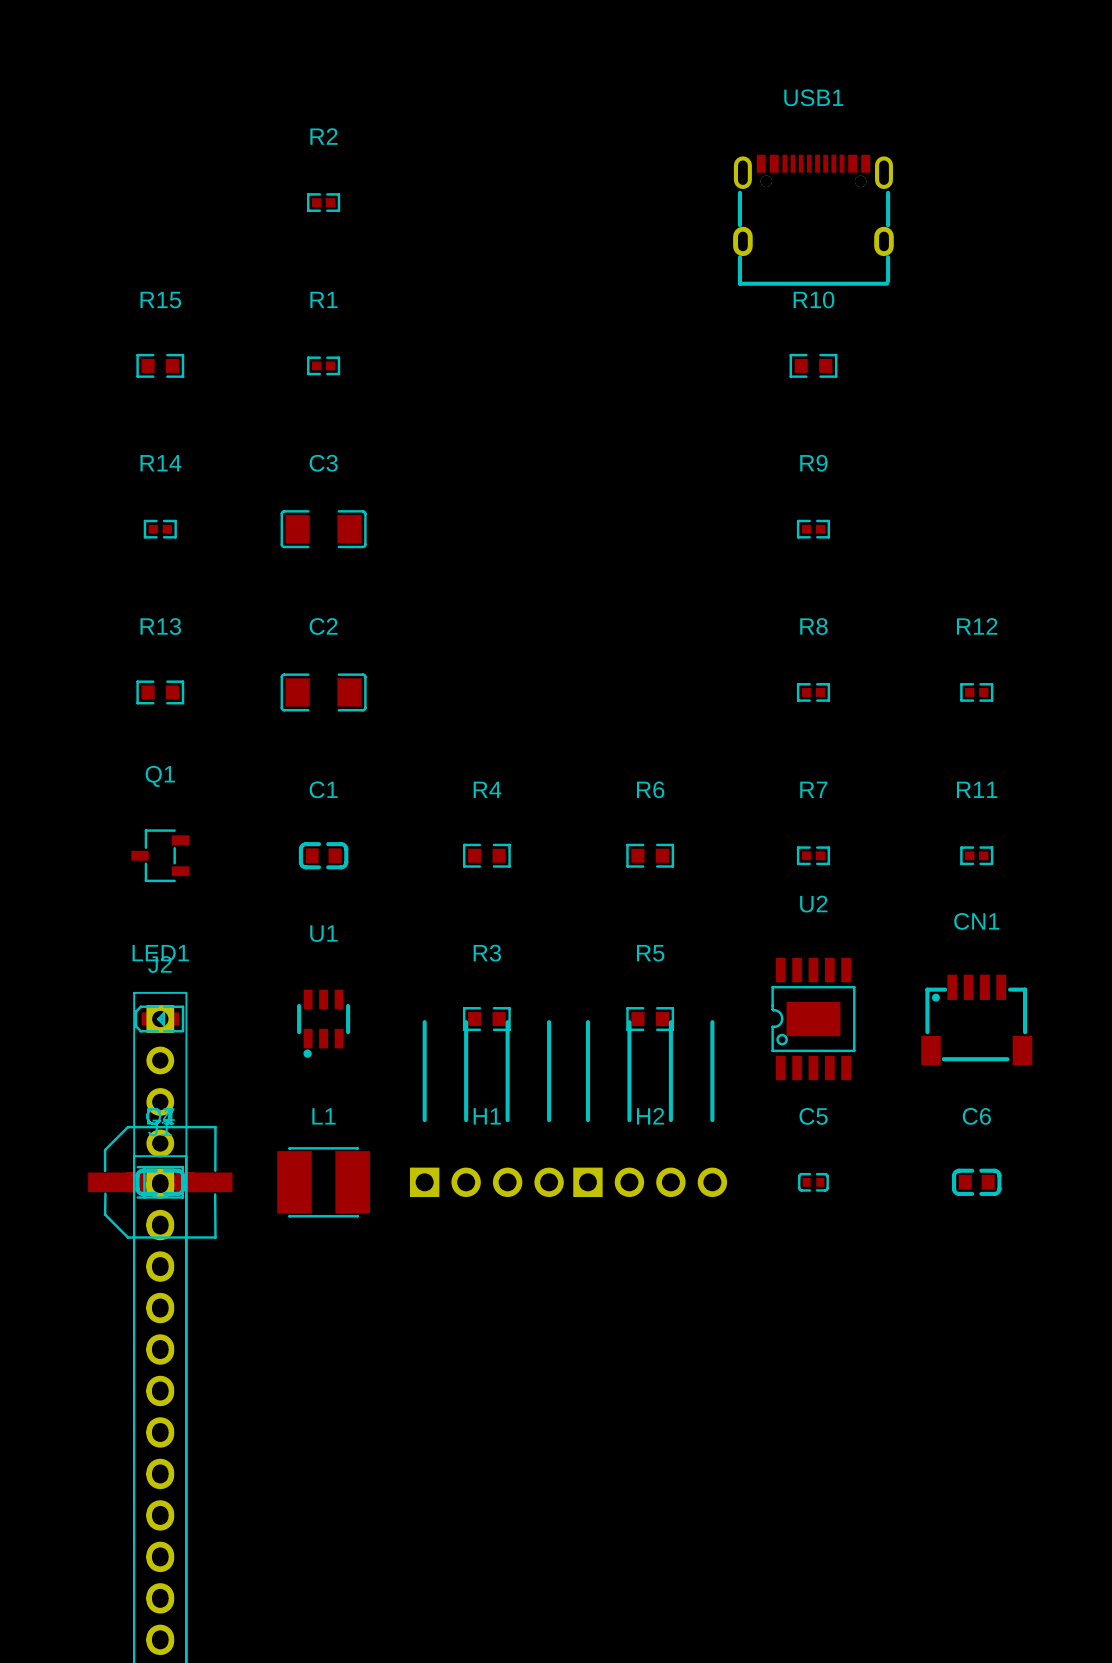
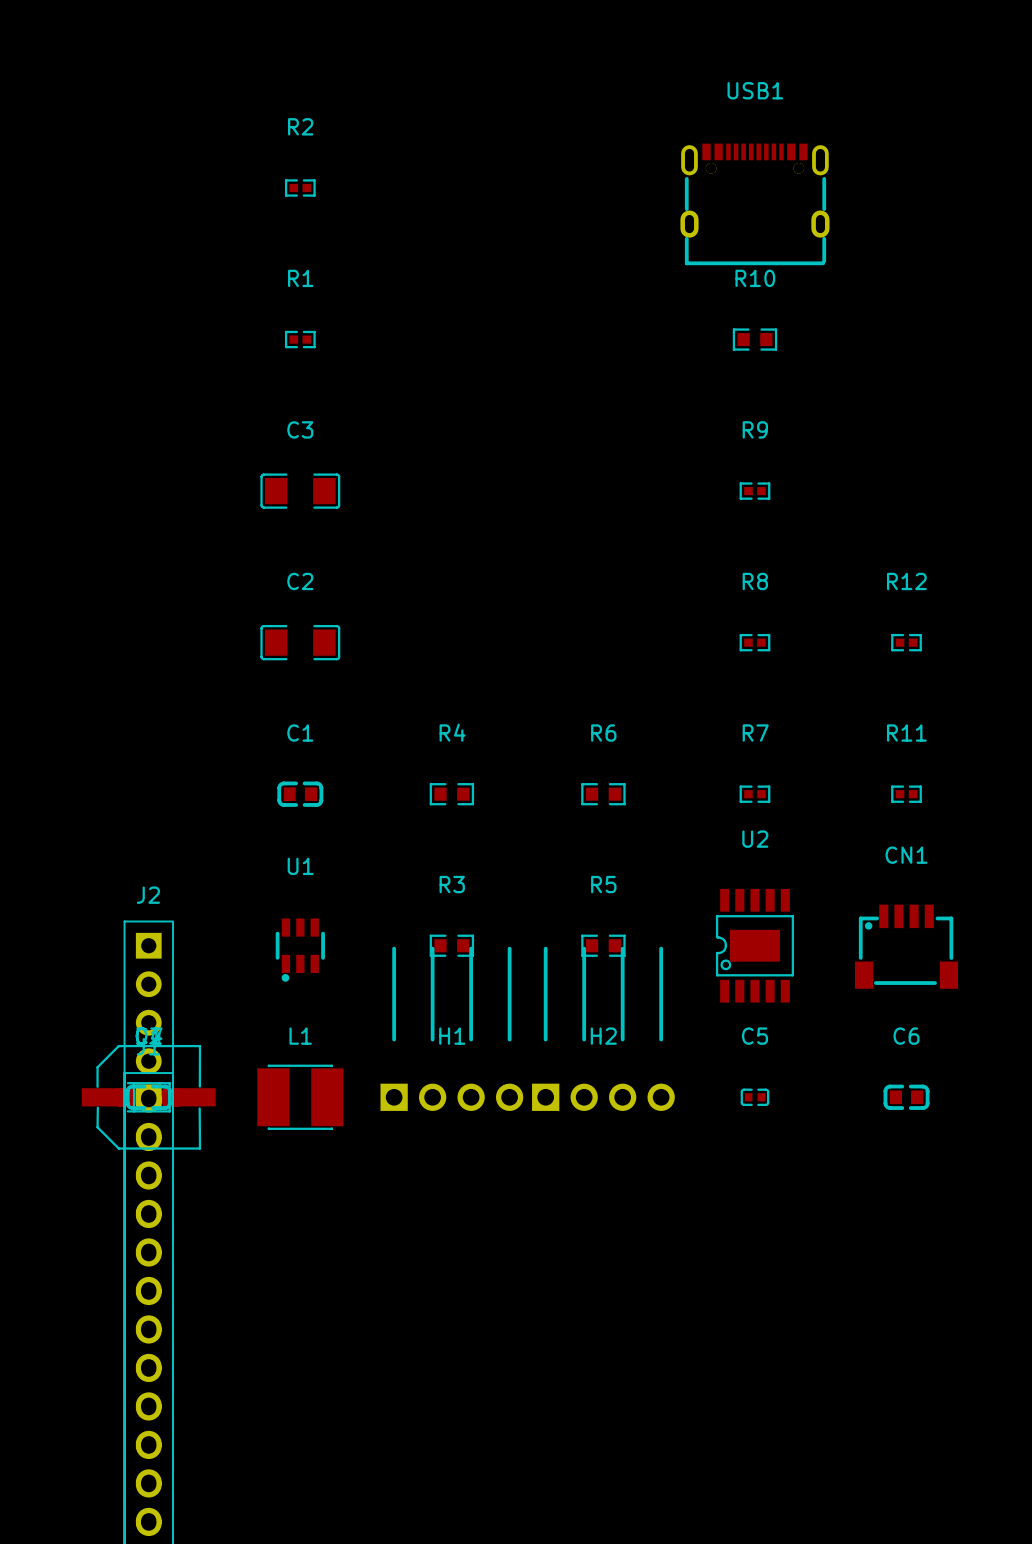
R15: (160, 365) -> none
R14: (160, 529) -> none
R13: (160, 692) -> none
Q1: (160, 855) -> none
LED1: (159, 1019) -> none

